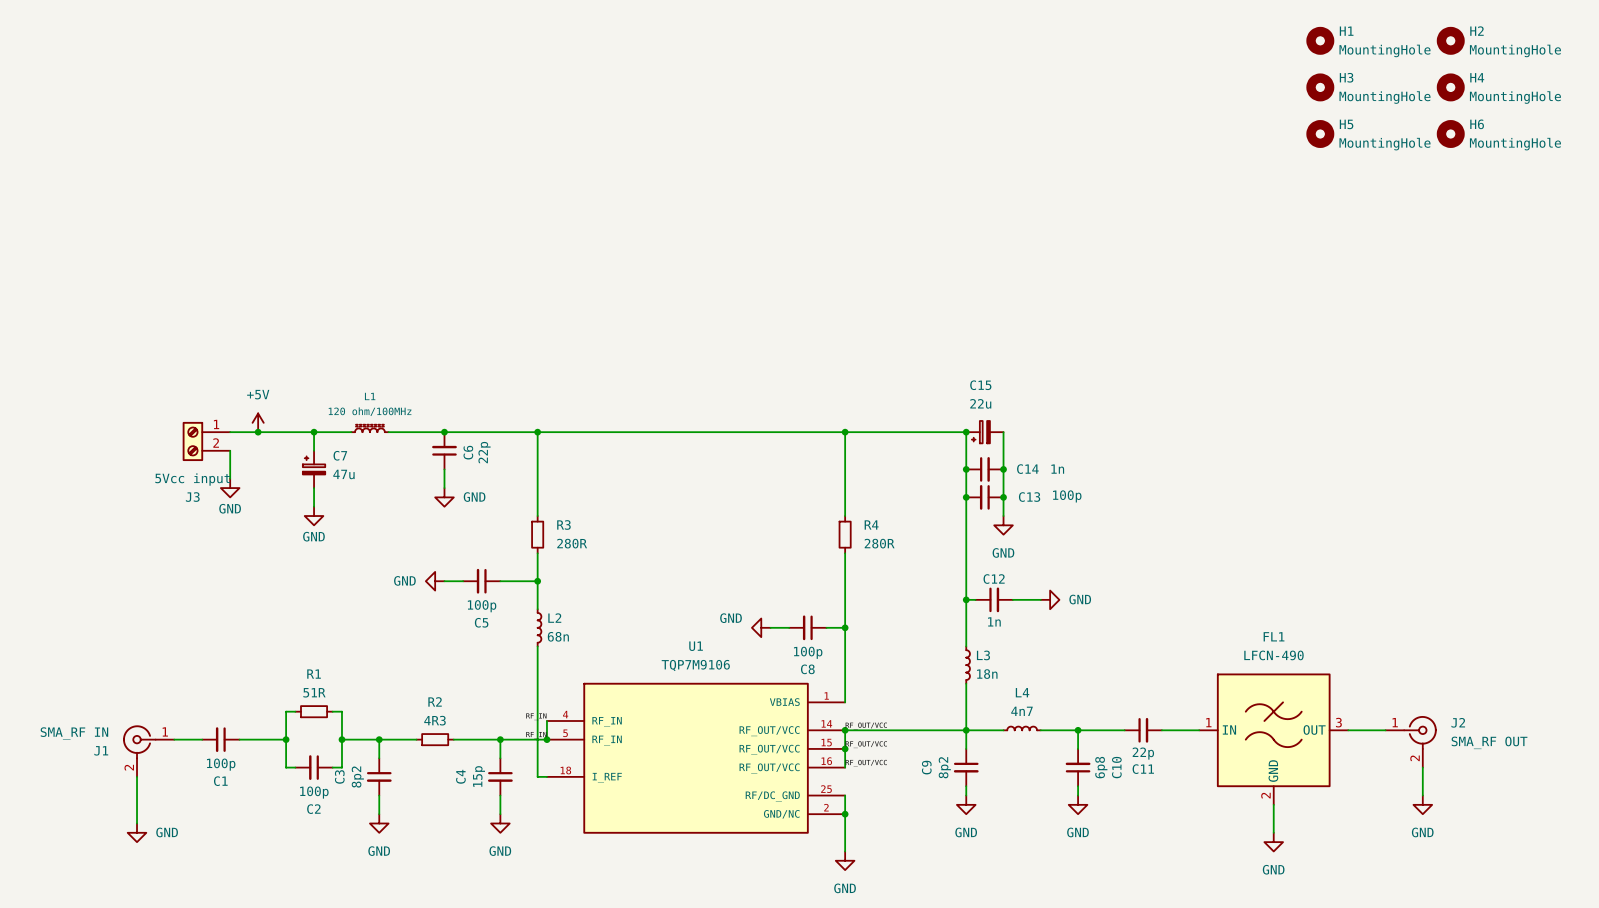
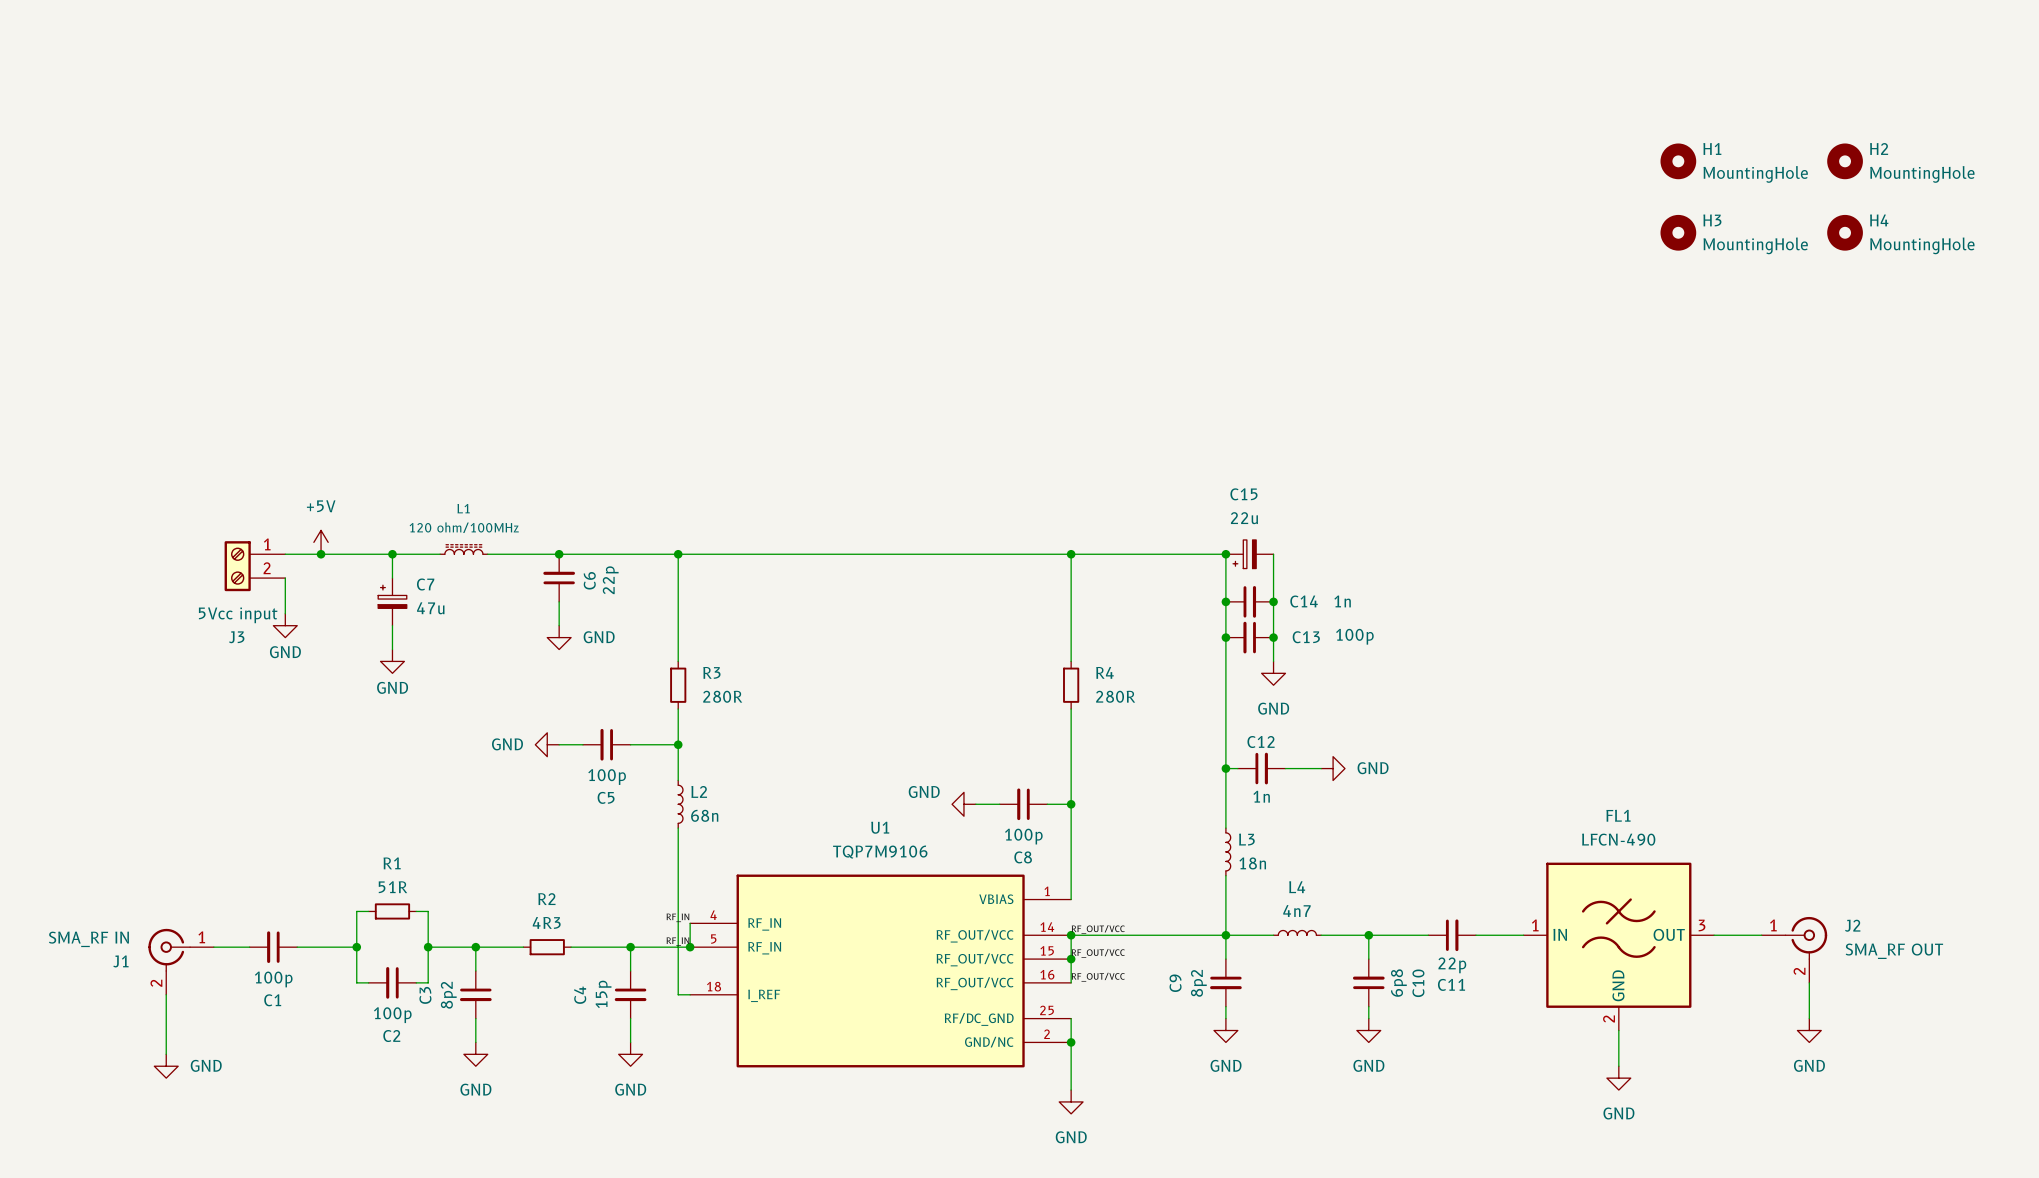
H1 position: (1320, 40) -> (1678, 161)
H2 position: (1450, 40) -> (1845, 161)
H3 position: (1320, 87) -> (1678, 232)
H4 position: (1450, 87) -> (1845, 232)
H5: MountingHole (1320, 134) -> none
H6: MountingHole (1450, 134) -> none

